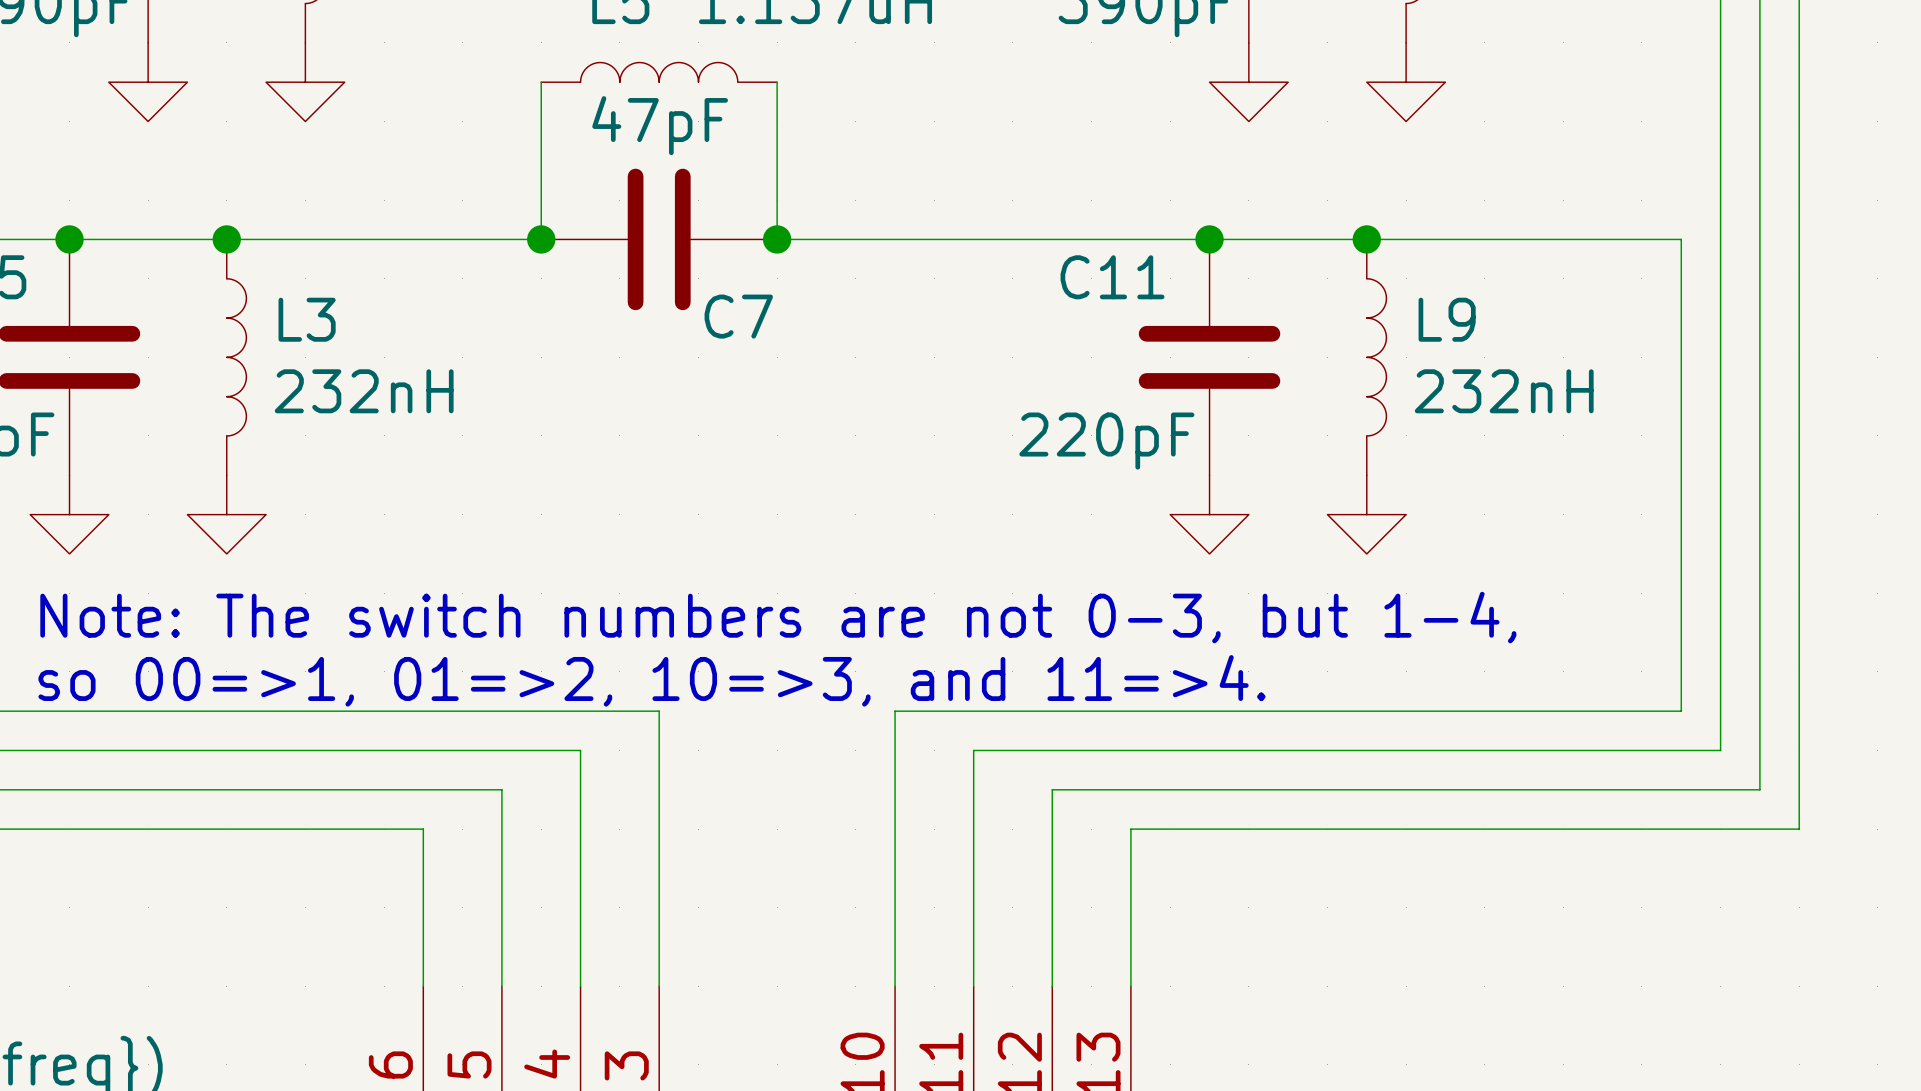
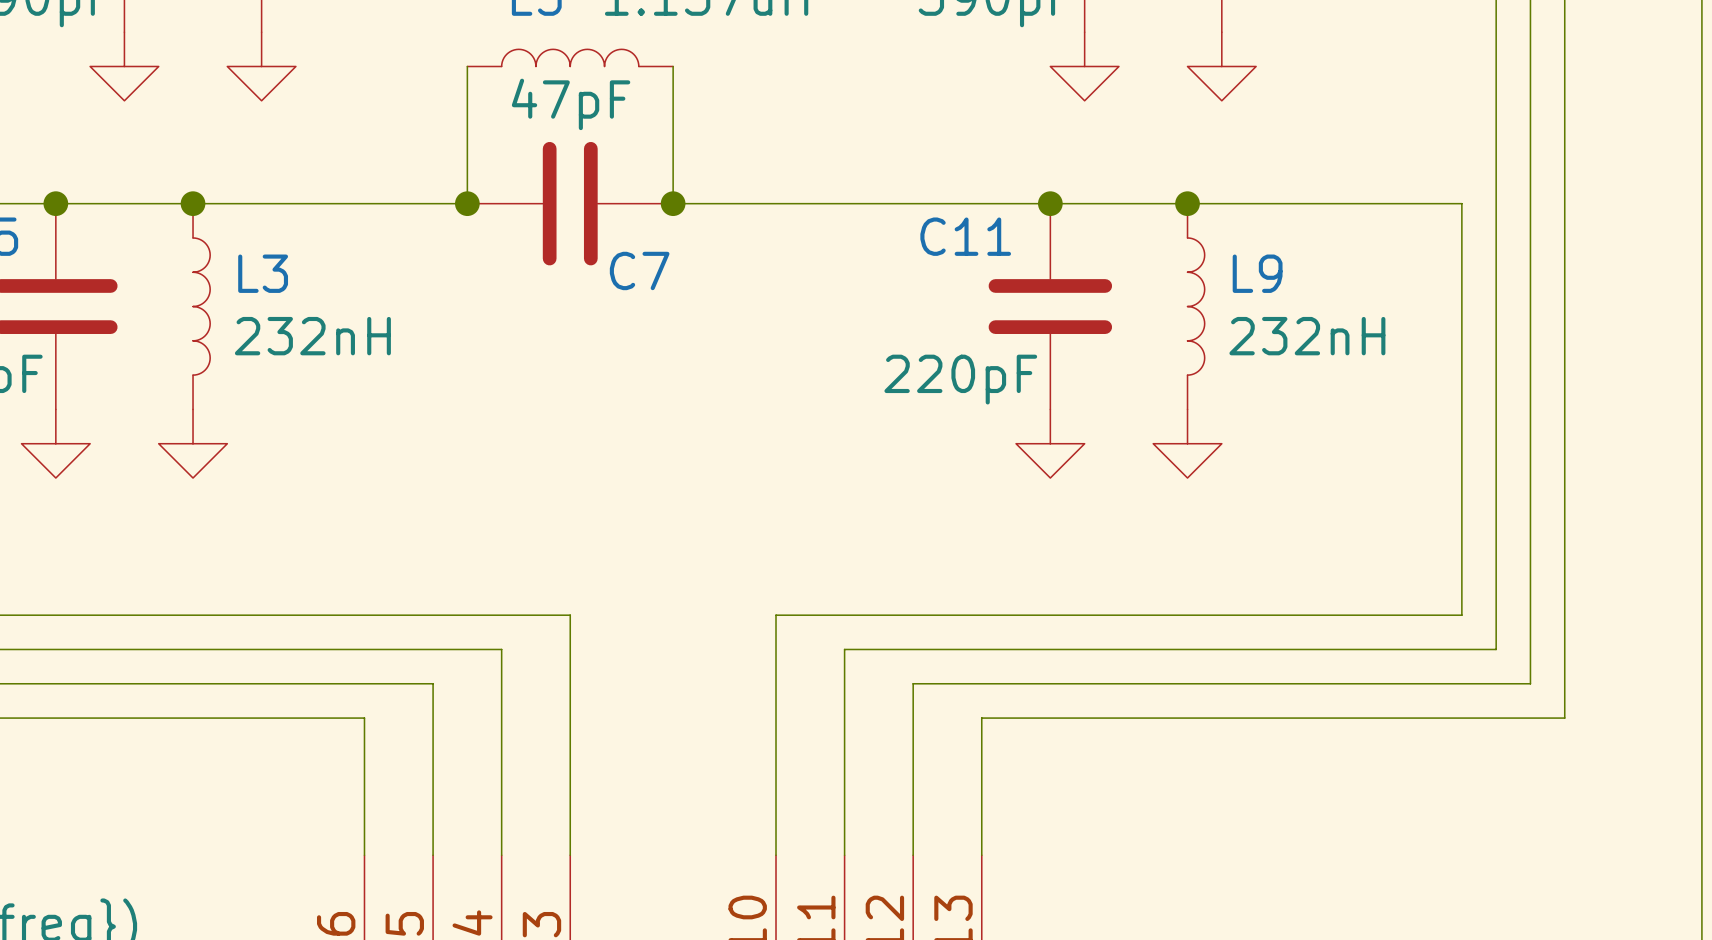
text: Note: The switch numbers are not 0-3, but 1-4, (778, 617) -> none
text: so 00=>1, 01=>2, 10=>3, and 11=>4. (651, 680) -> none

